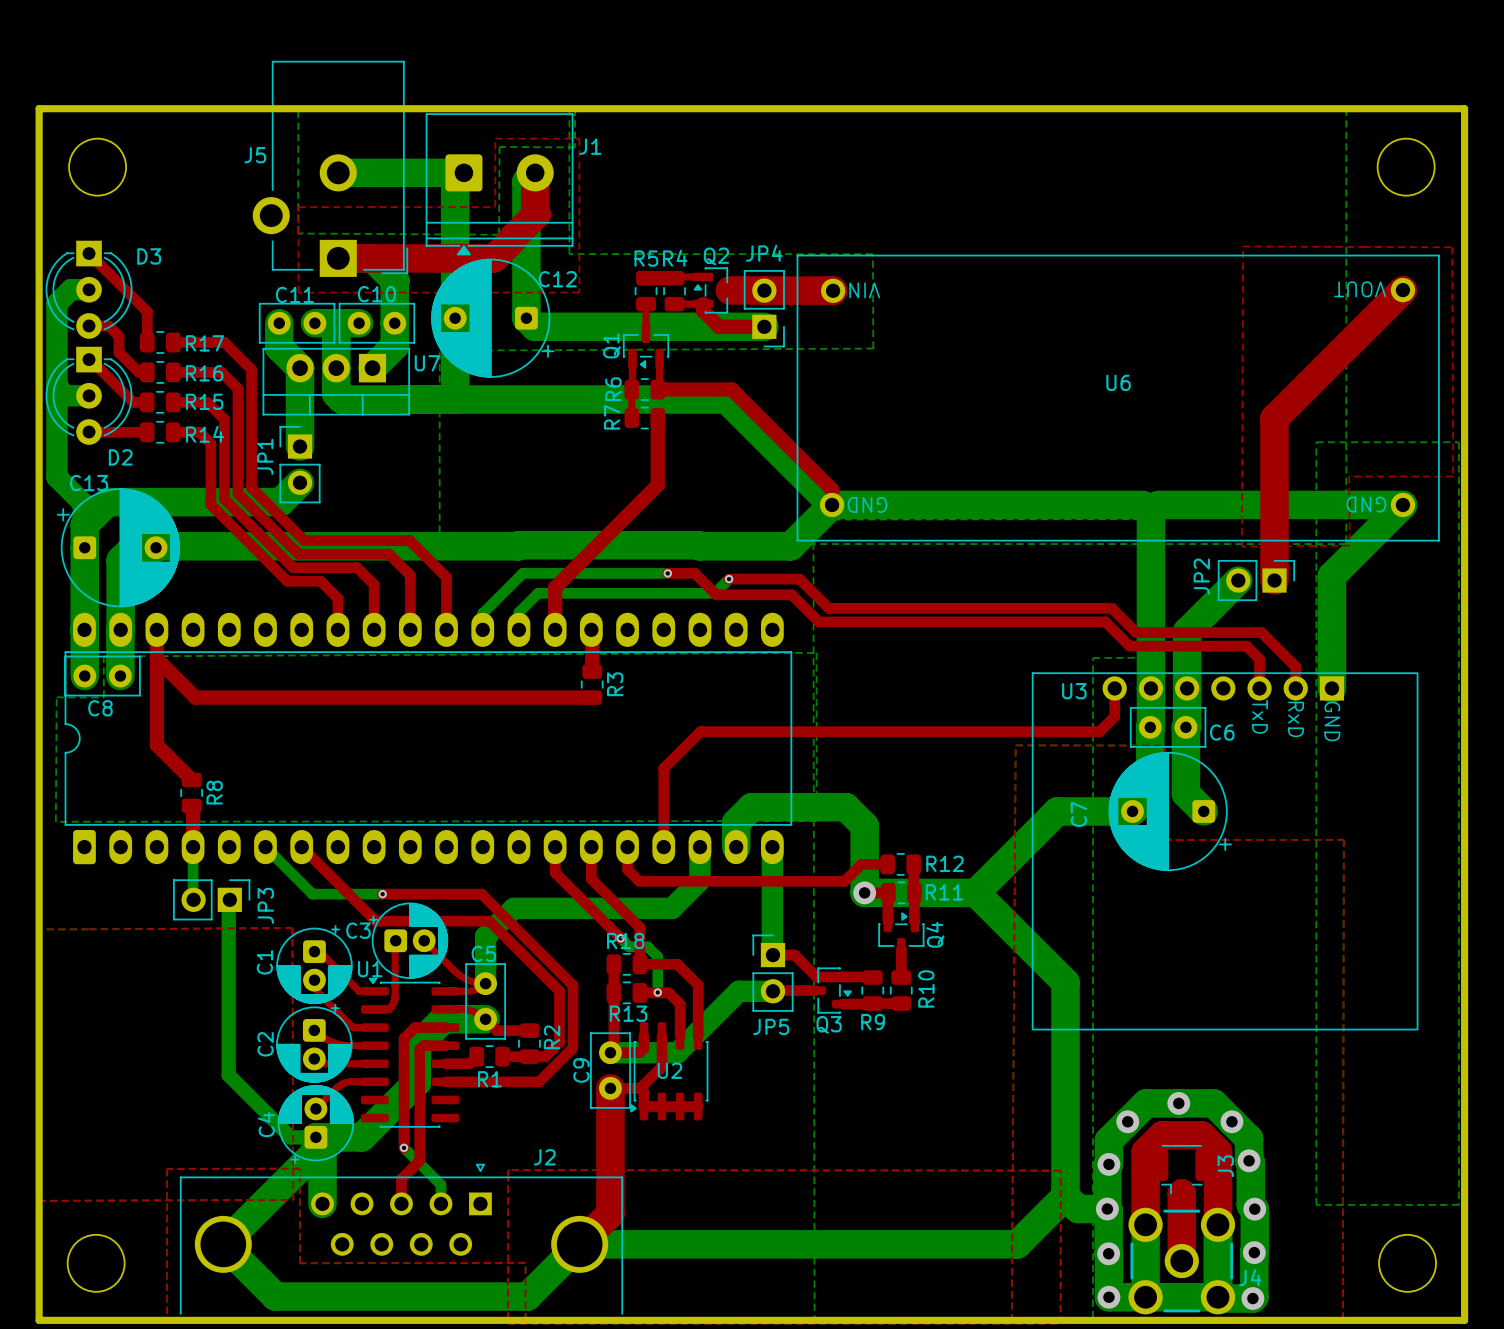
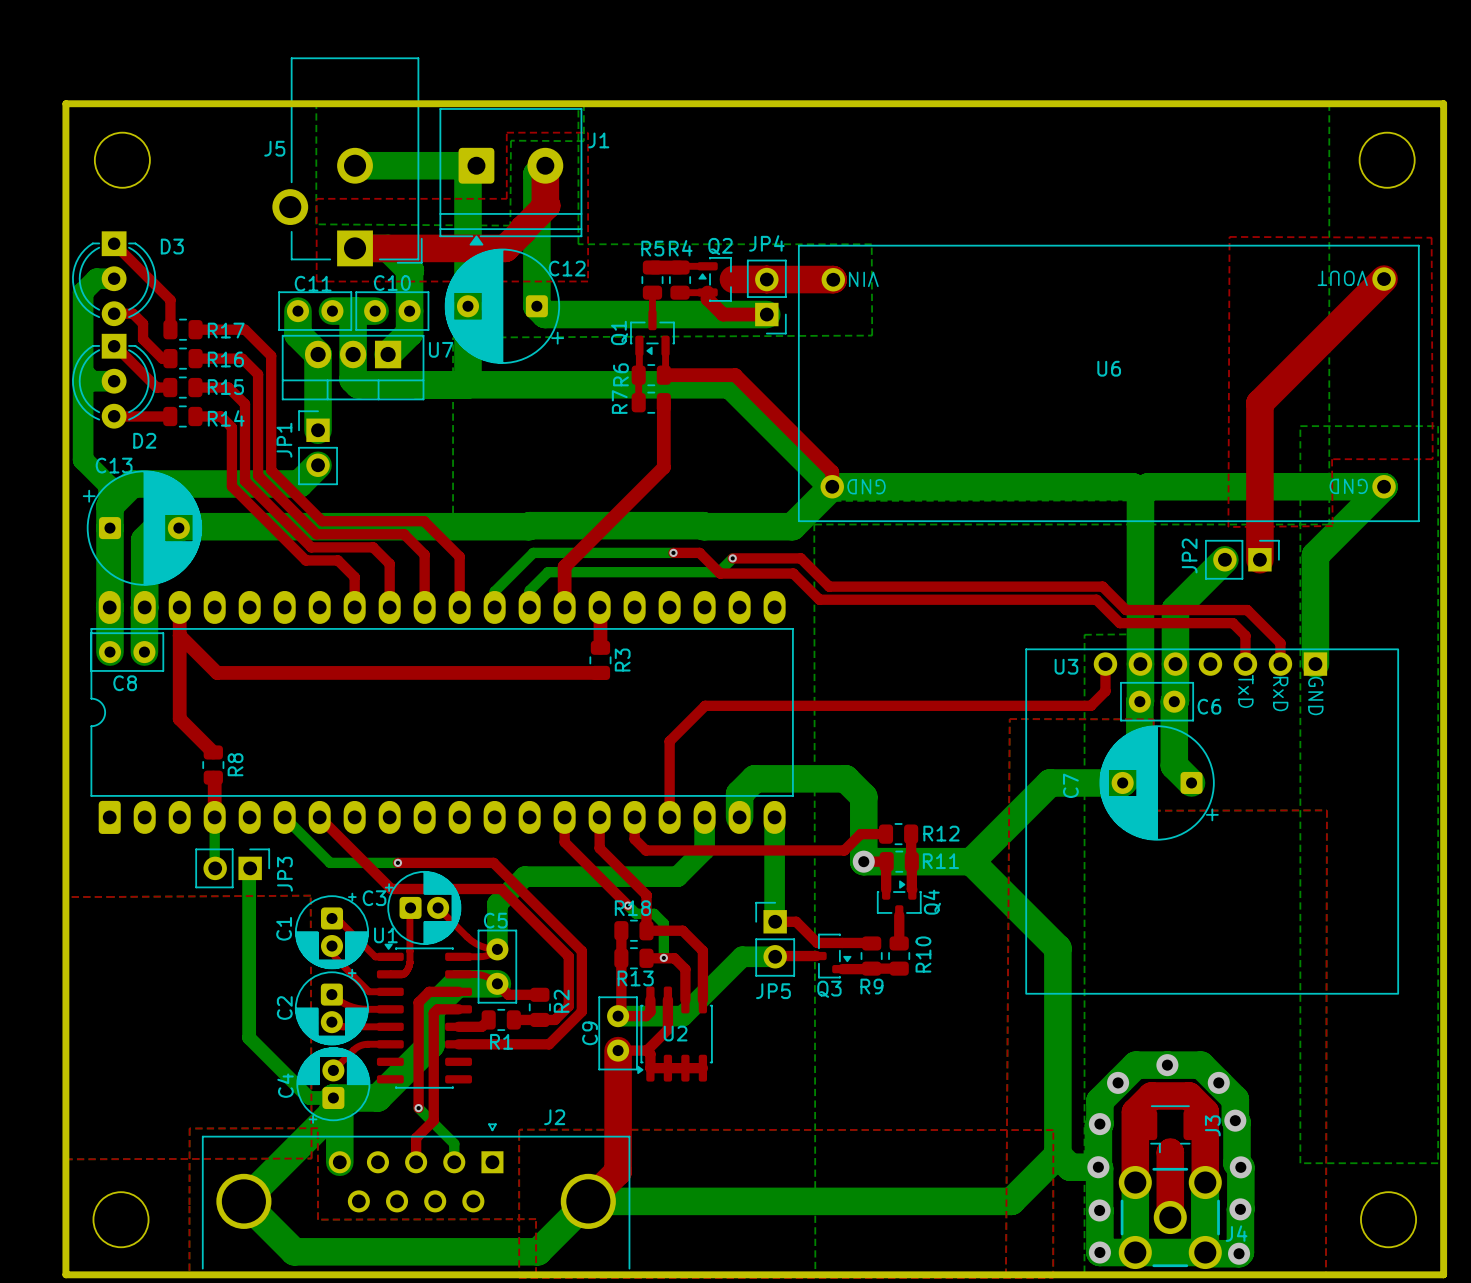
bottom zone outline: (816, 652) (103, 656) (103, 697) (56, 697) (55, 821) (816, 821) (816, 652) -> none

